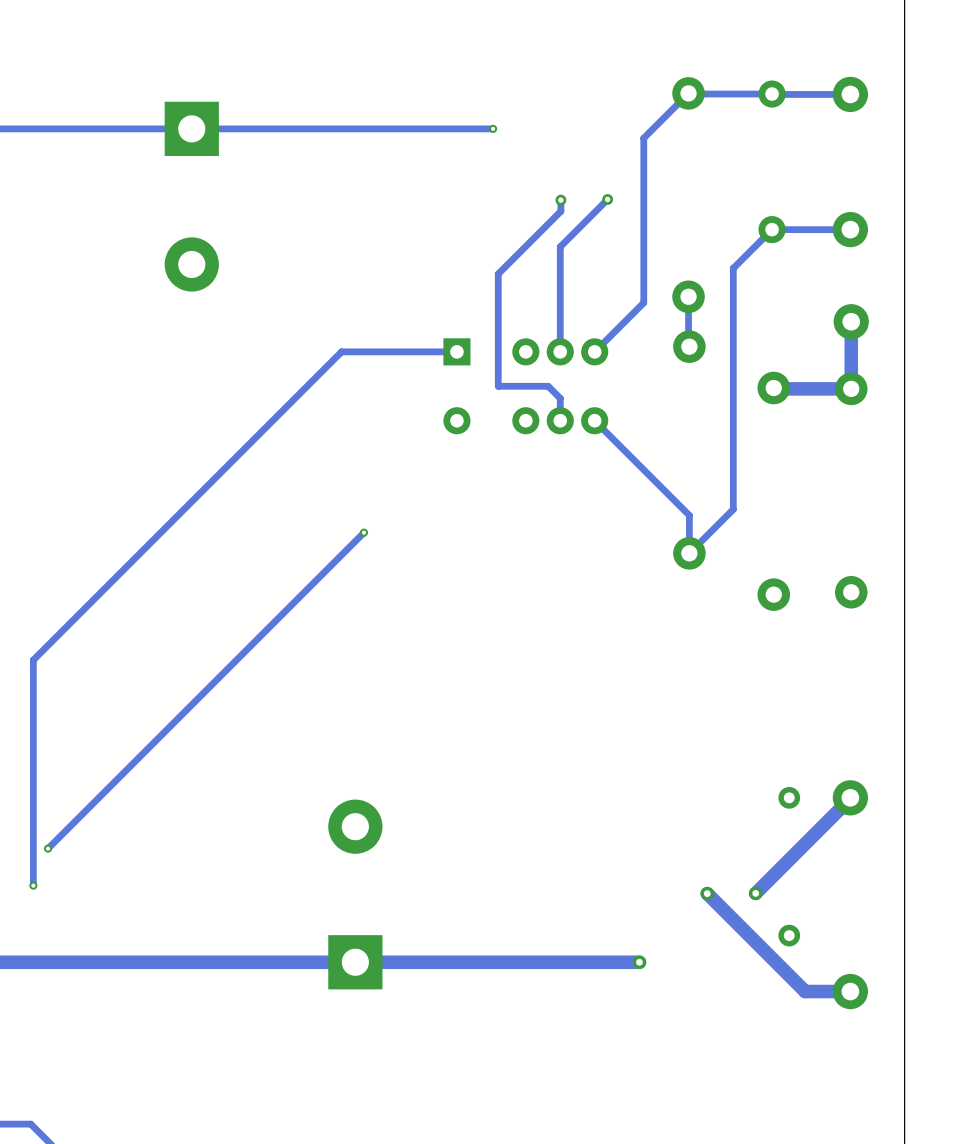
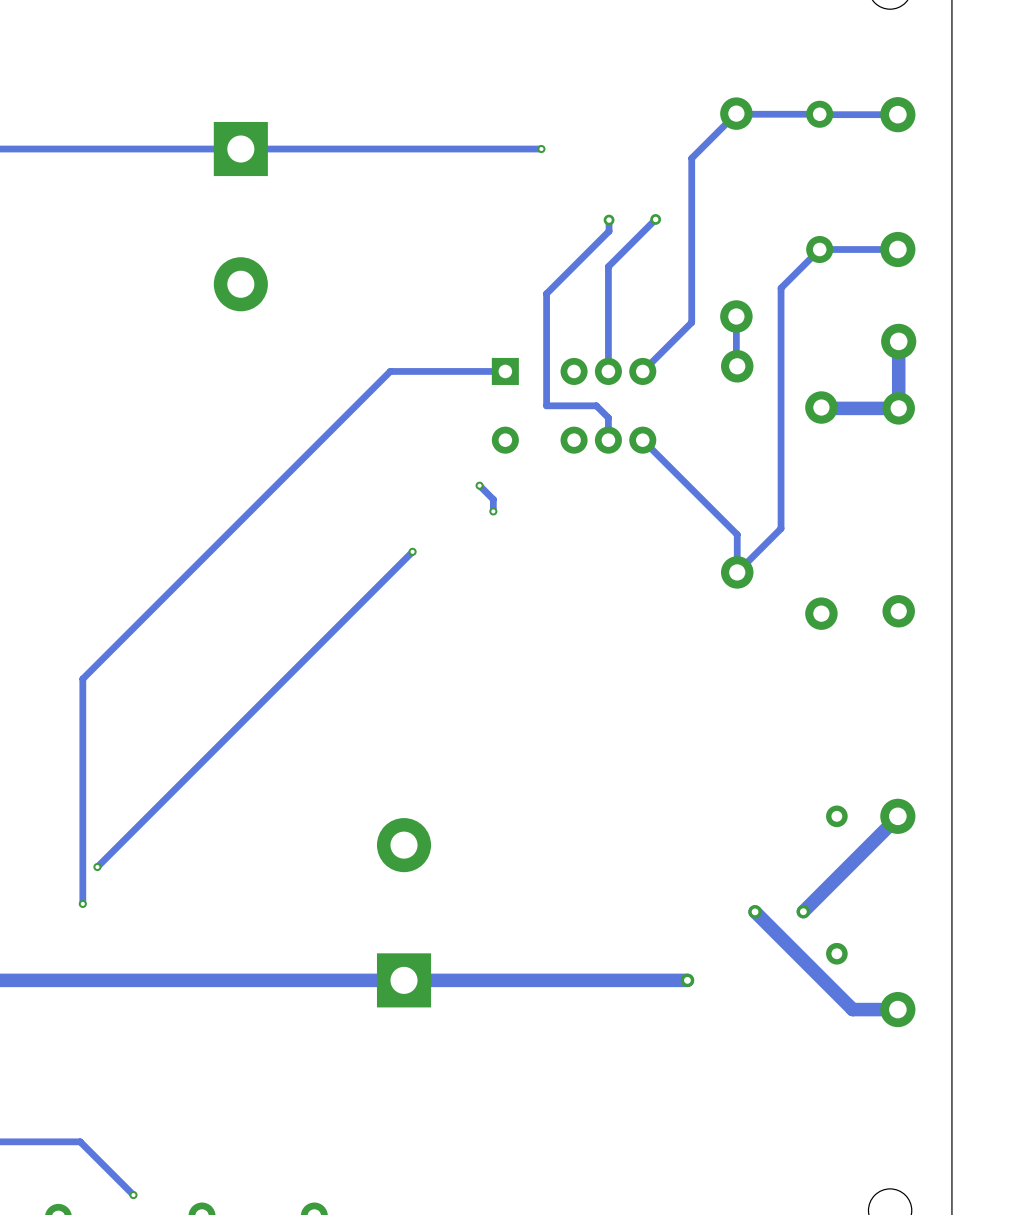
track: none -> (479, 485) (493, 499) (493, 511)
via: none -> (479, 485)
via: none -> (493, 511)

